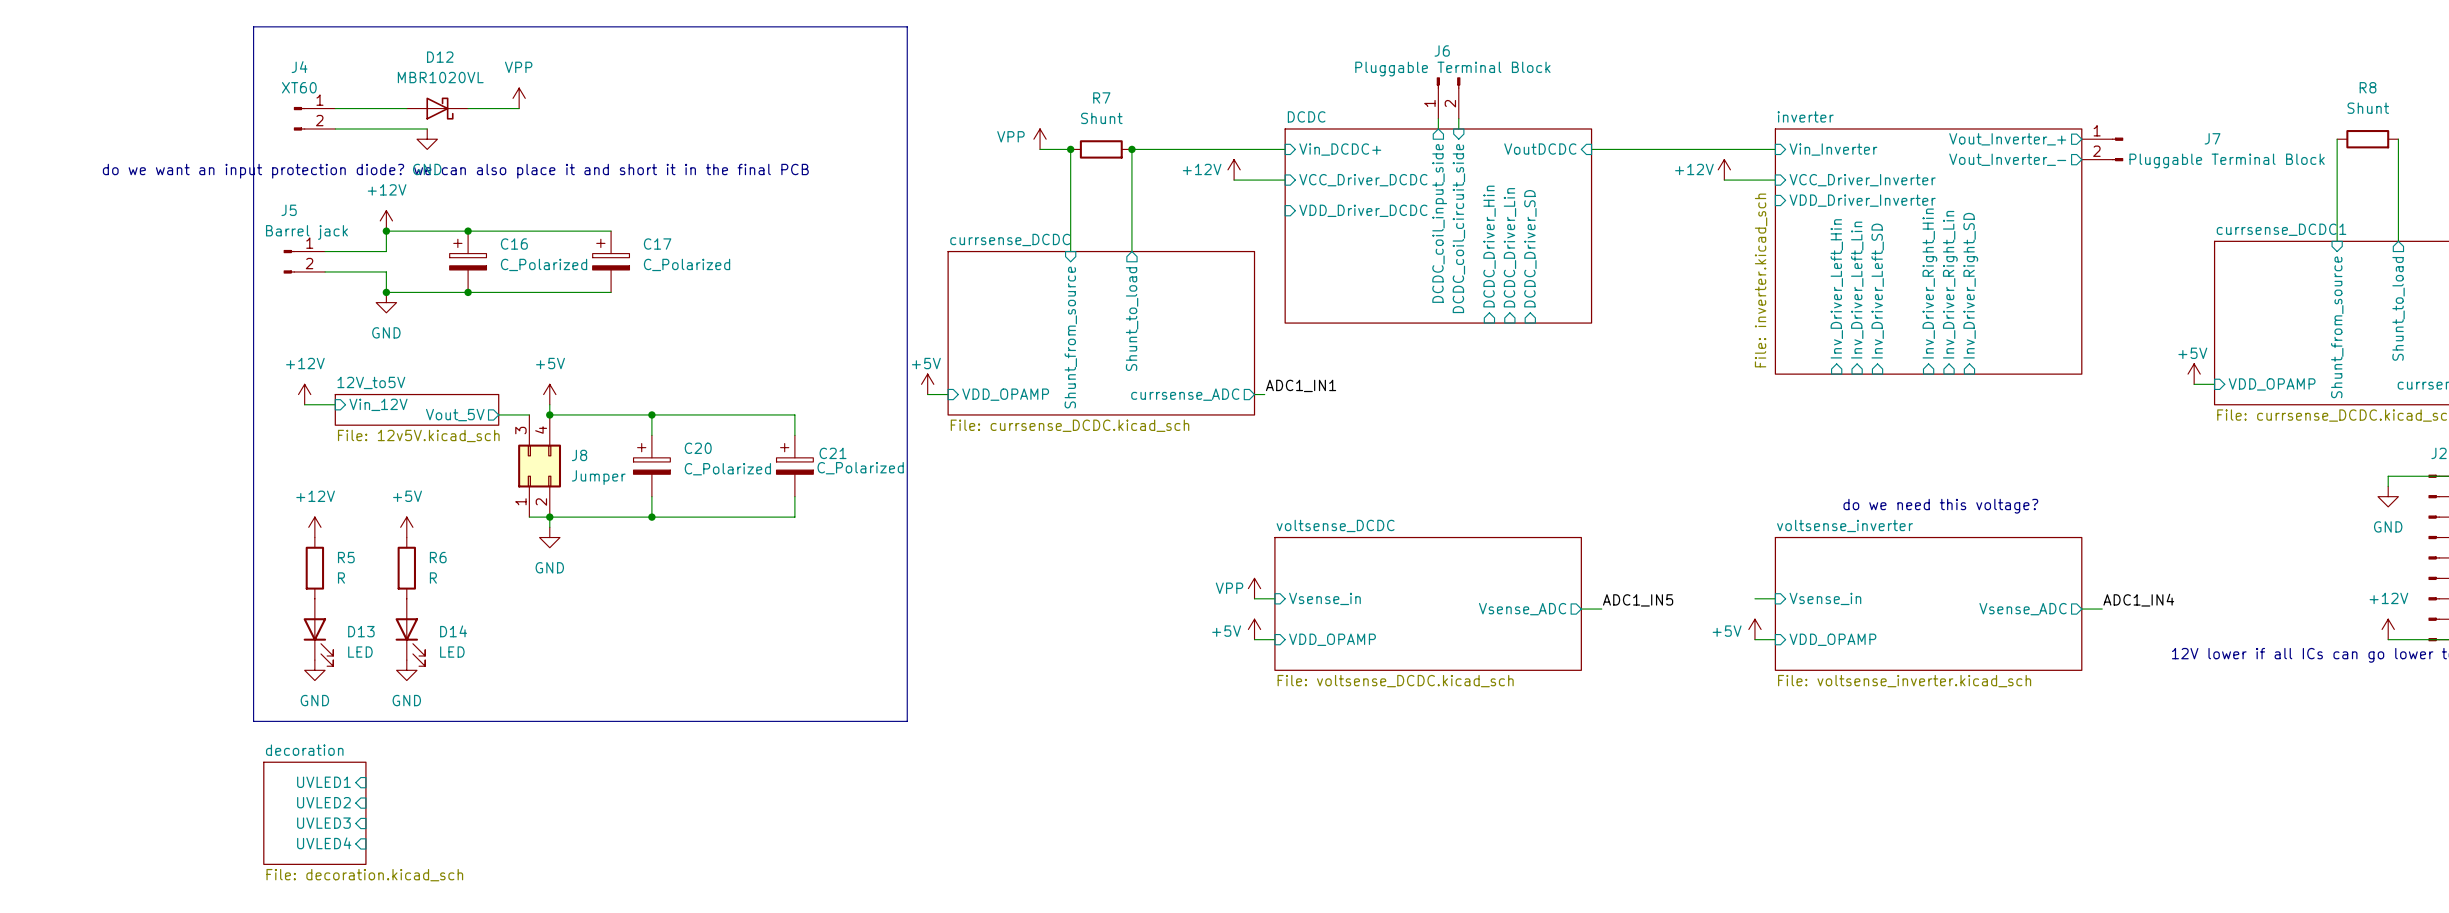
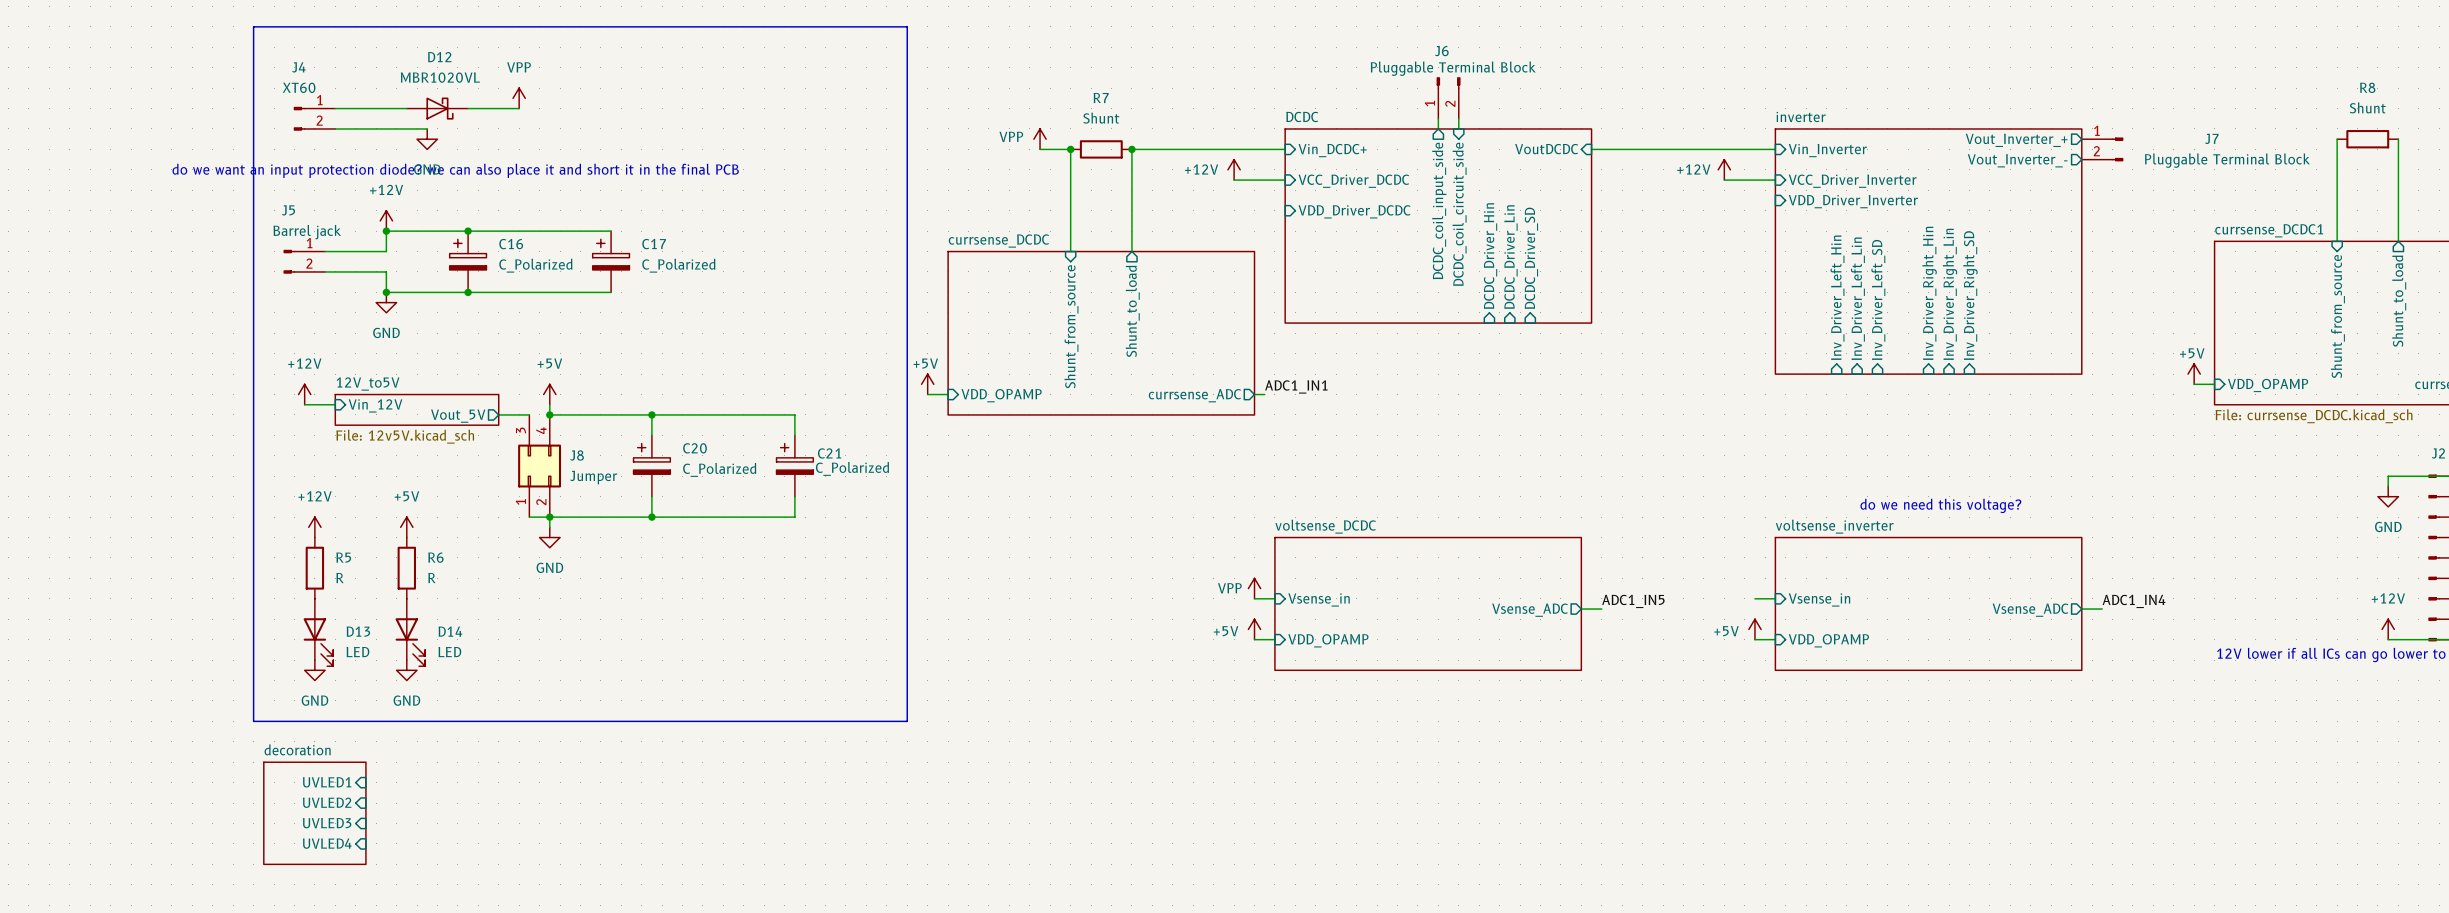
sheet inverter value: File: inverter.kicad_sch (1761, 280) -> none
sheet currsense_DCDC value: File: currsense_DCDC.kicad_sch (1070, 425) -> none
sheet voltsense_DCDC value: File: voltsense_DCDC.kicad_sch (1395, 681) -> none
sheet voltsense_inverter value: File: voltsense_inverter.kicad_sch (1904, 681) -> none
sheet decoration value: File: decoration.kicad_sch (364, 875) -> none

